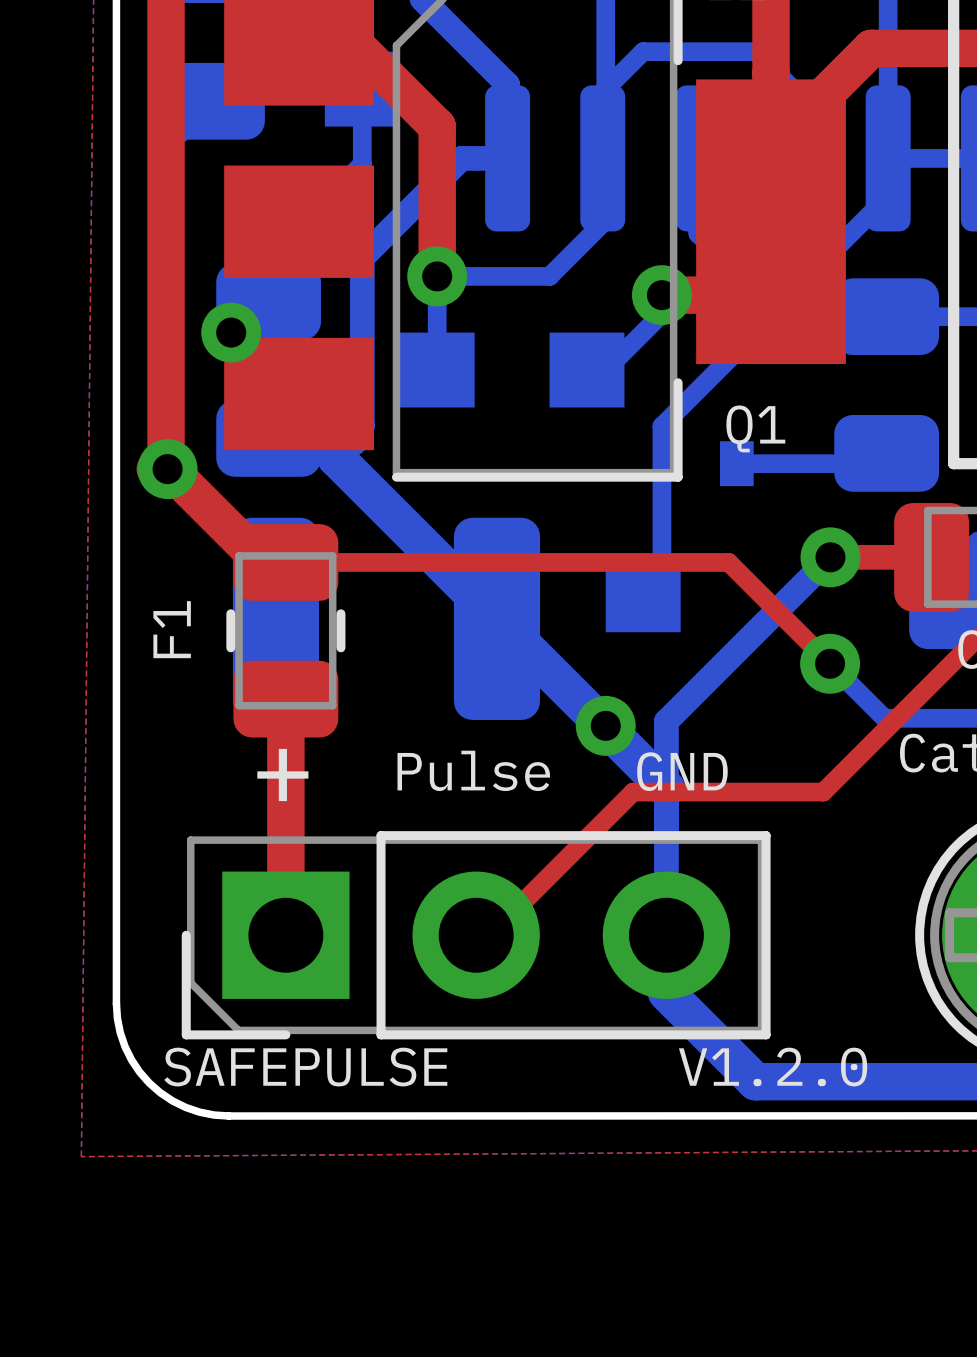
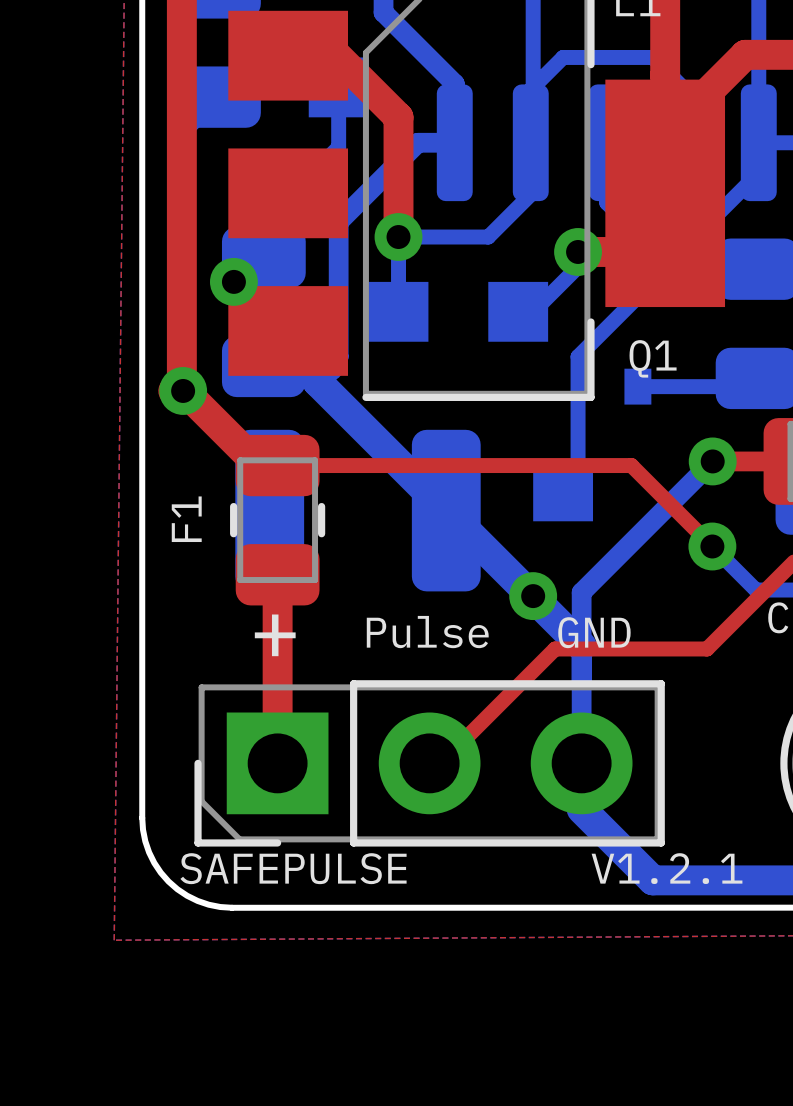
text: SAFEPULSE V1.2.0 (515, 1067) -> SAFEPULSE V1.2.1 (461, 868)

